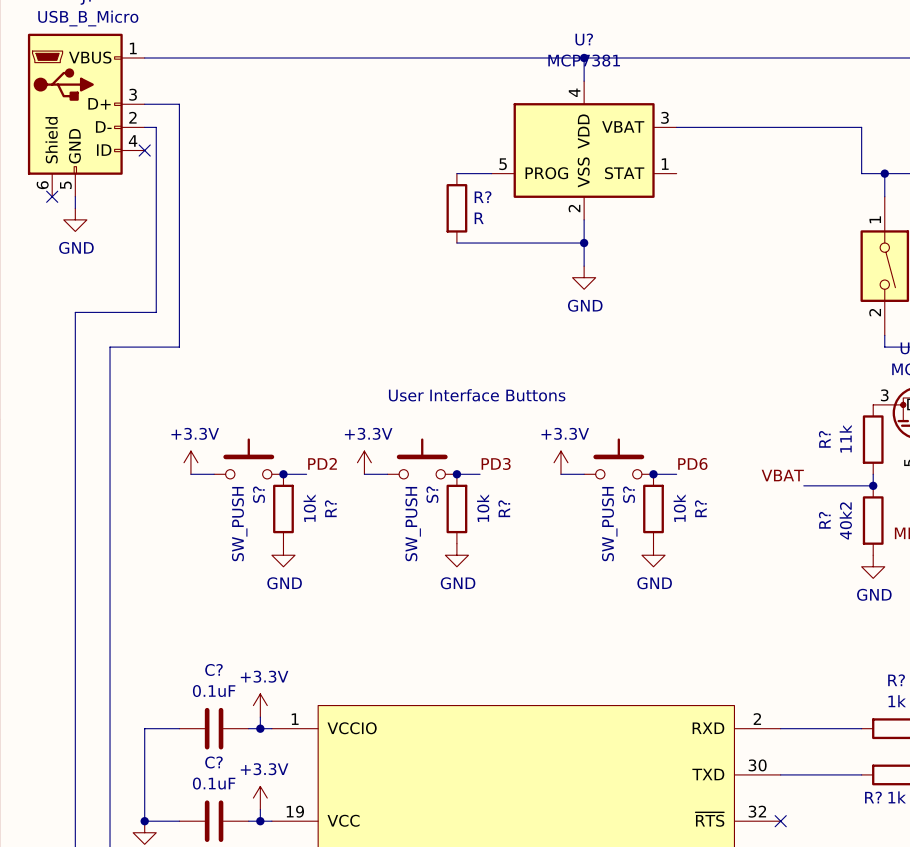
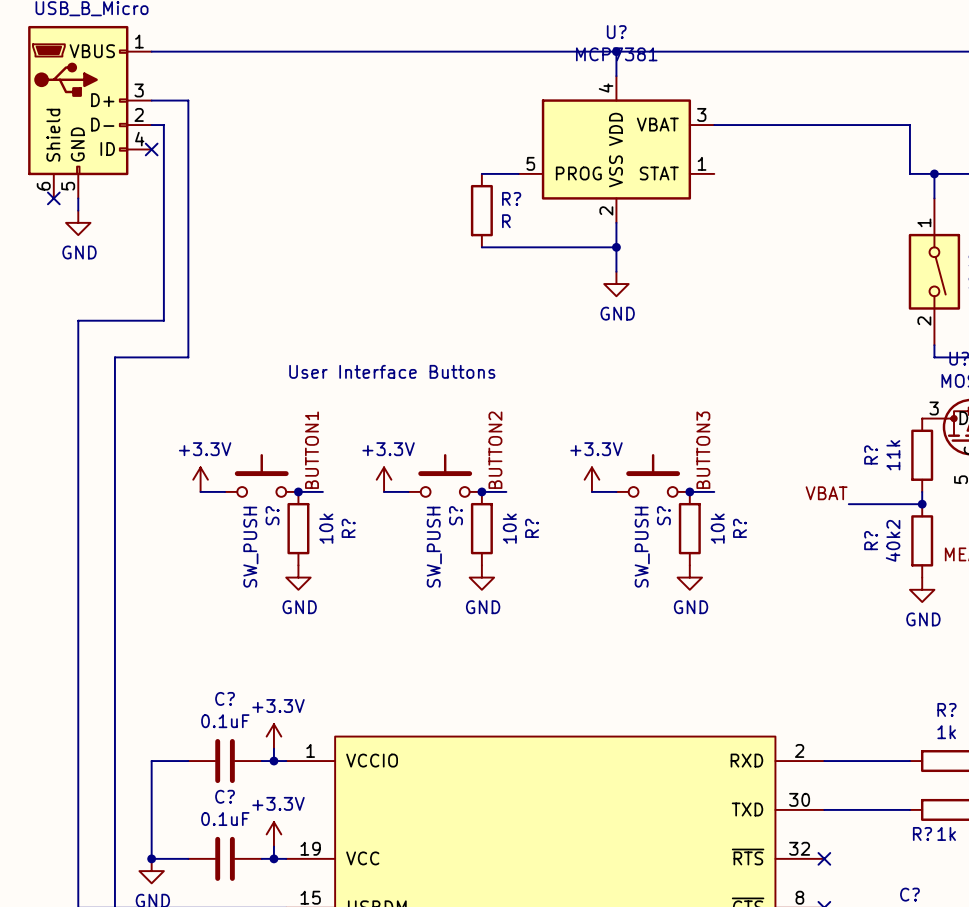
text position: User Interface Buttons (477, 395) -> User Interface Buttons (392, 371)
label: PD2 (322, 463) -> BUTTON1 (311, 450)
label: PD3 (496, 463) -> BUTTON2 (495, 450)
label: PD6 (692, 463) -> BUTTON3 (703, 450)

